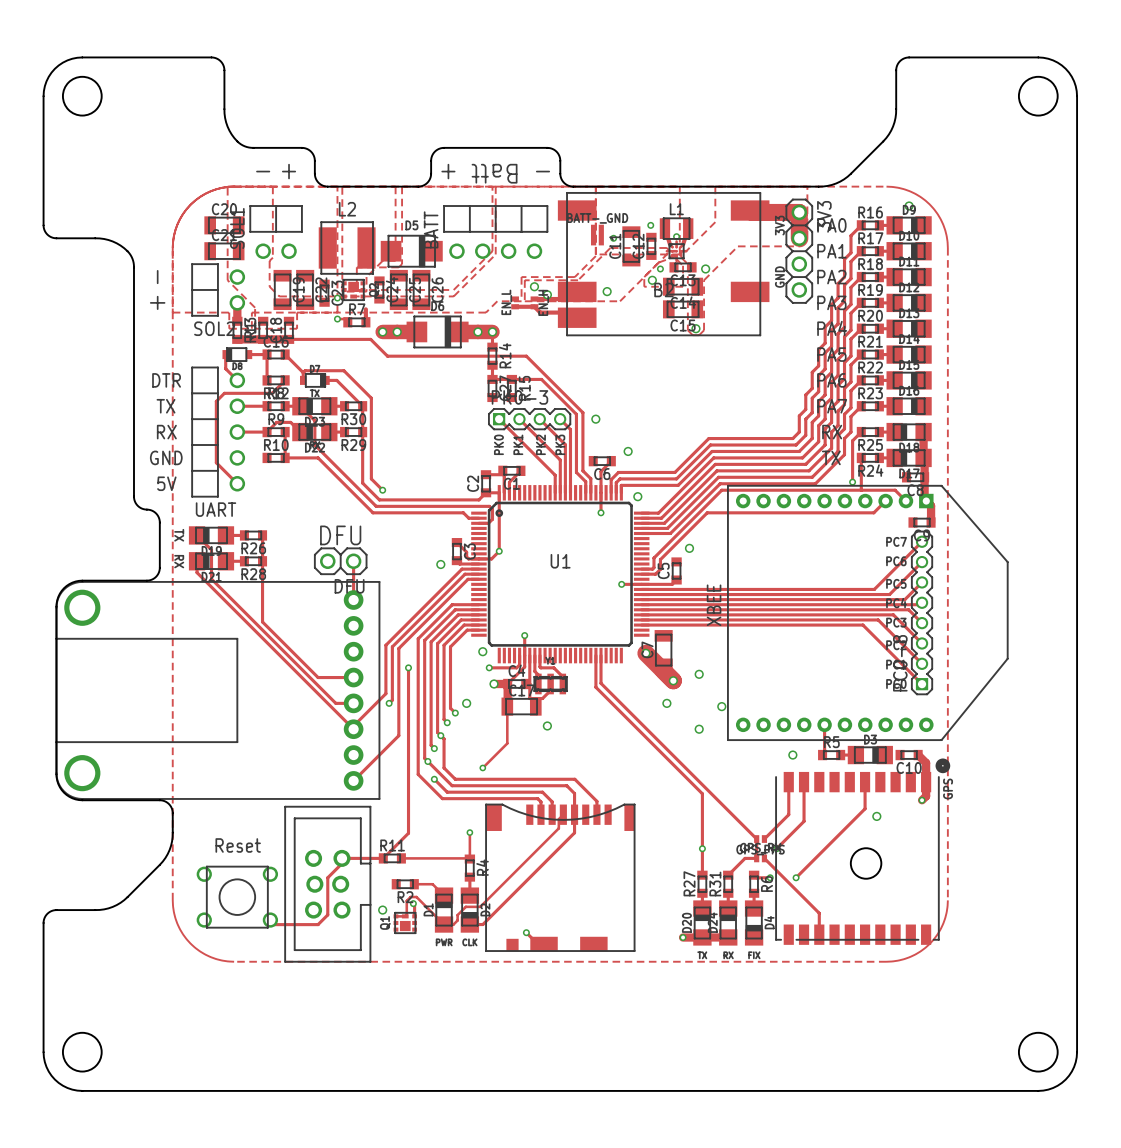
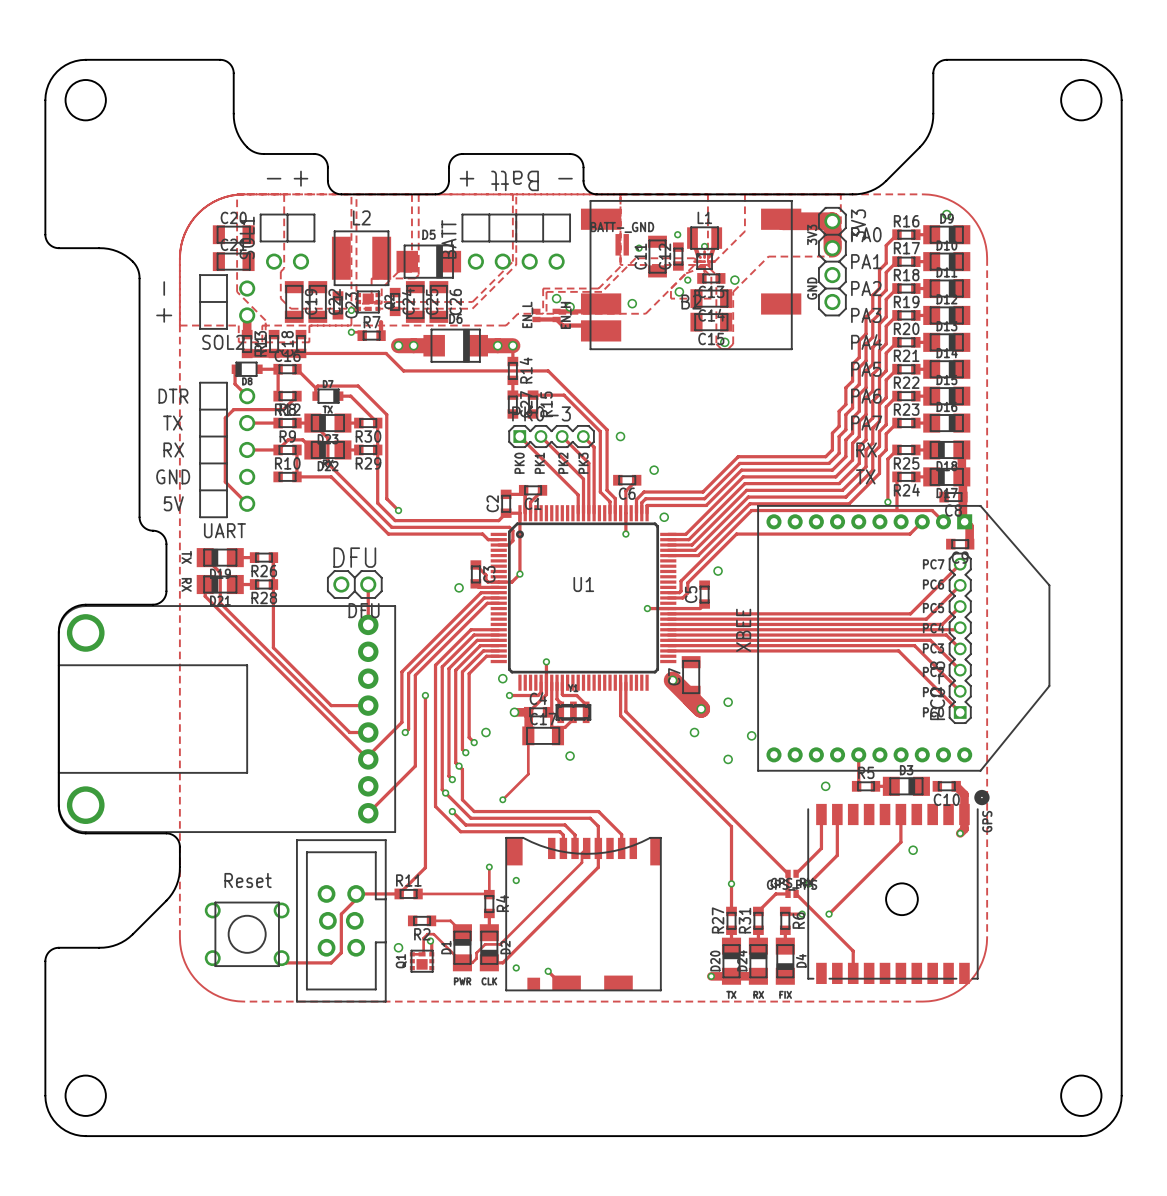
via: none -> (516, 880)
via: none -> (516, 967)

